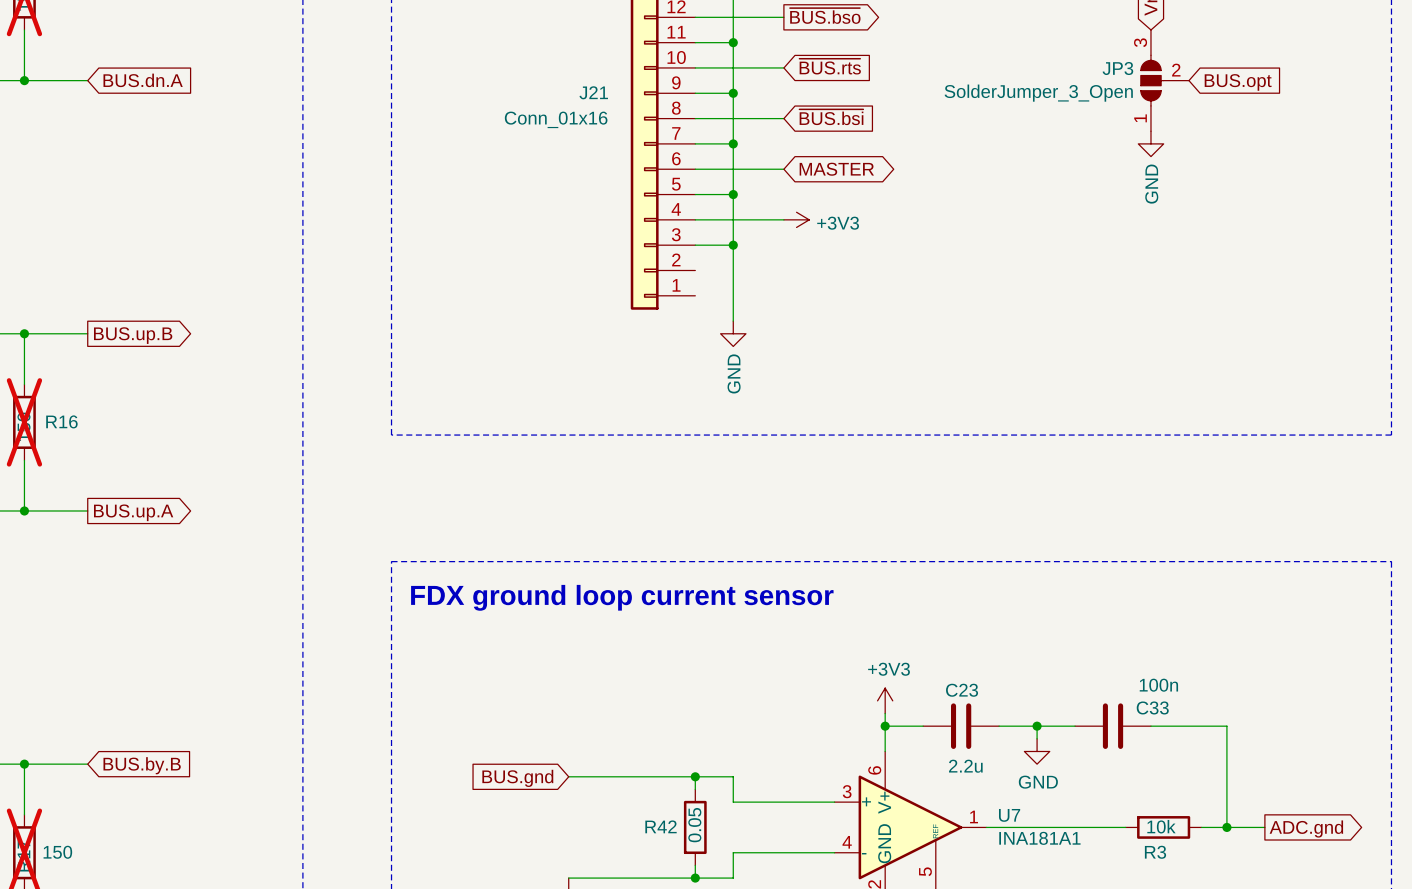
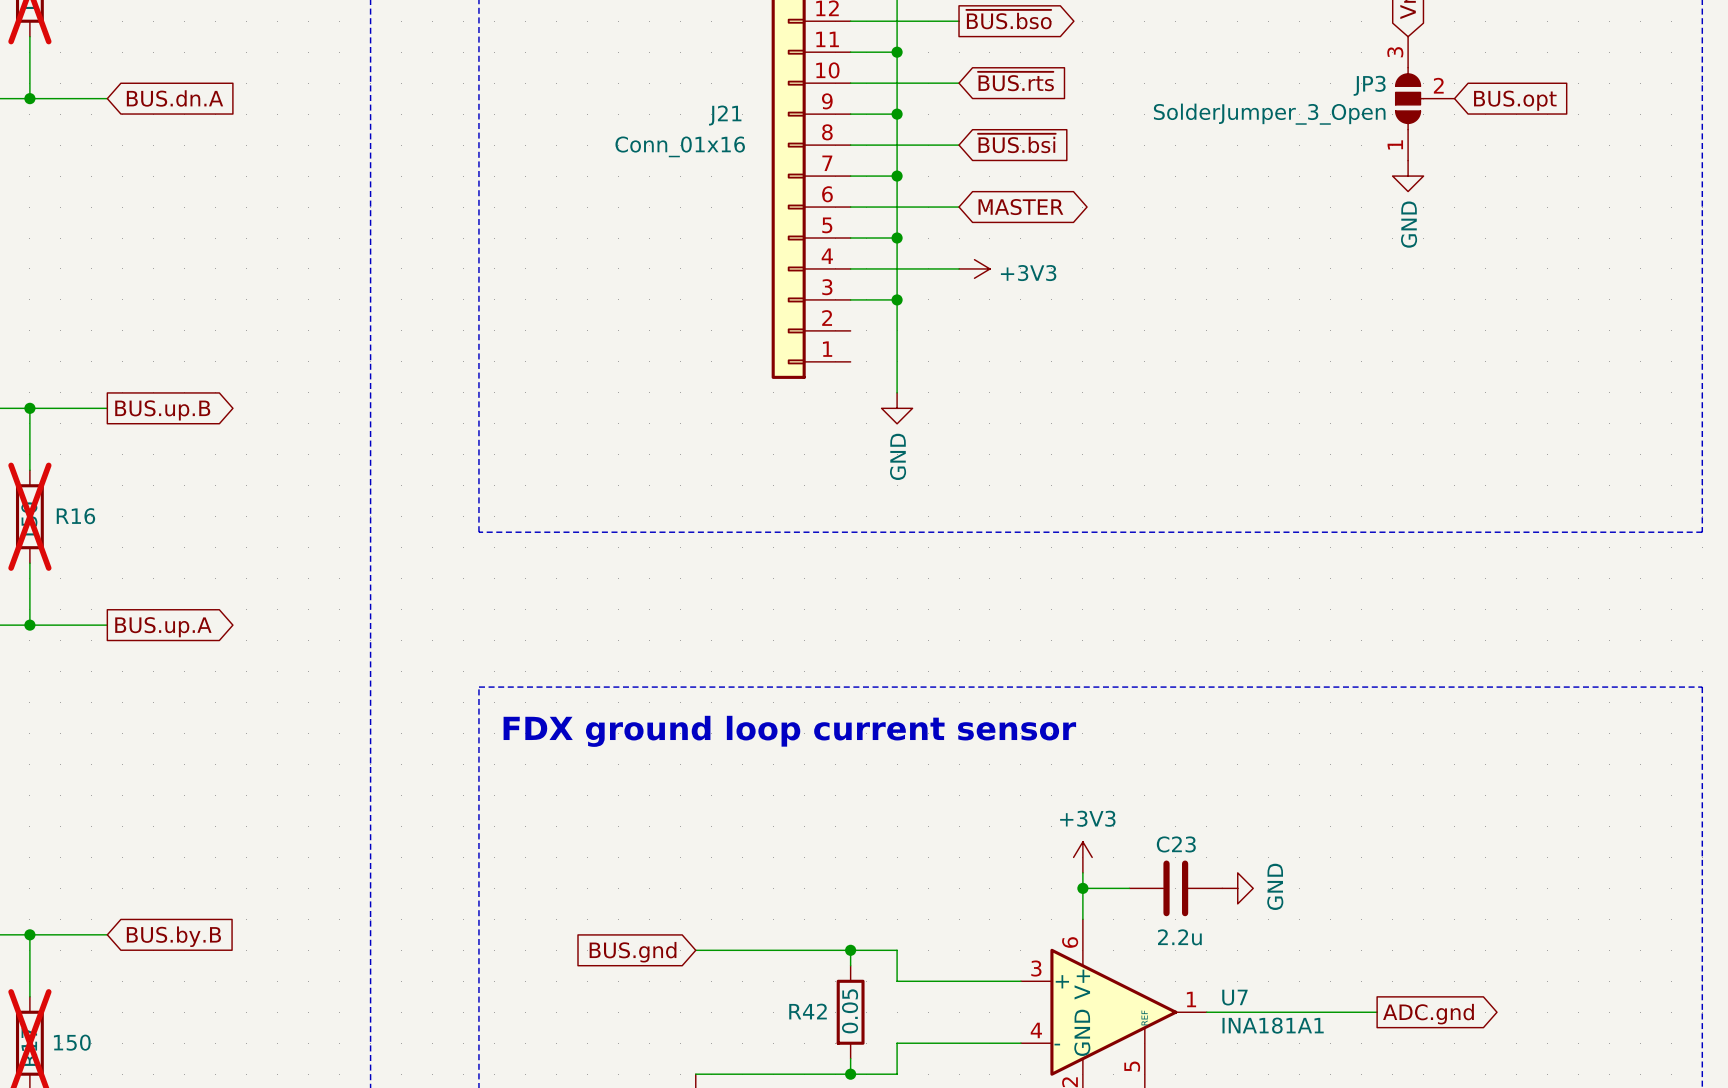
wire: (999, 726) (1075, 726) -> none
wire: (1037, 726) (1037, 738) -> none
junction: (1037, 726) -> none
C33: 100n (1113, 726) -> none
wire: (1150, 726) (1226, 726) (1226, 827) -> none
power symbol rotation: 0° (1037, 751) -> 90° counterclockwise (1237, 888)
power symbol position: GND (1037, 751) -> GND (1237, 888)
R3: 10k (1163, 827) -> none
wire: (1201, 827) (1264, 827) -> none
junction: (1226, 827) -> none
global label position: ADC.gnd (1306, 829) -> ADC.gnd (1428, 1014)

